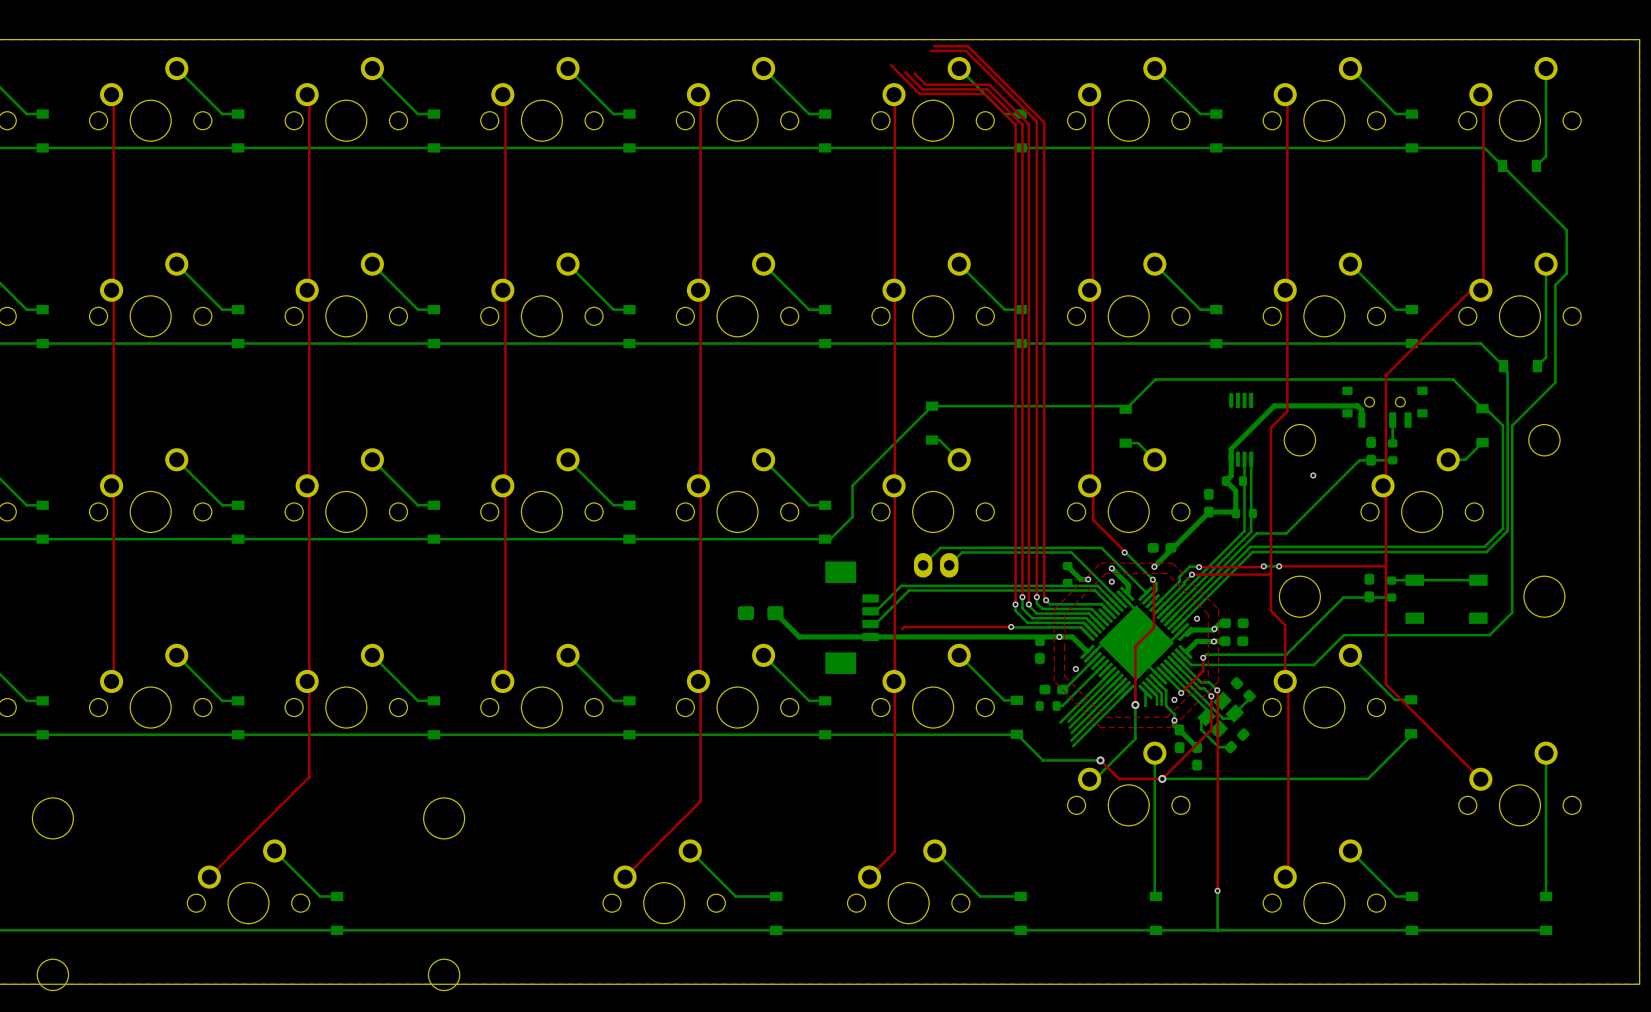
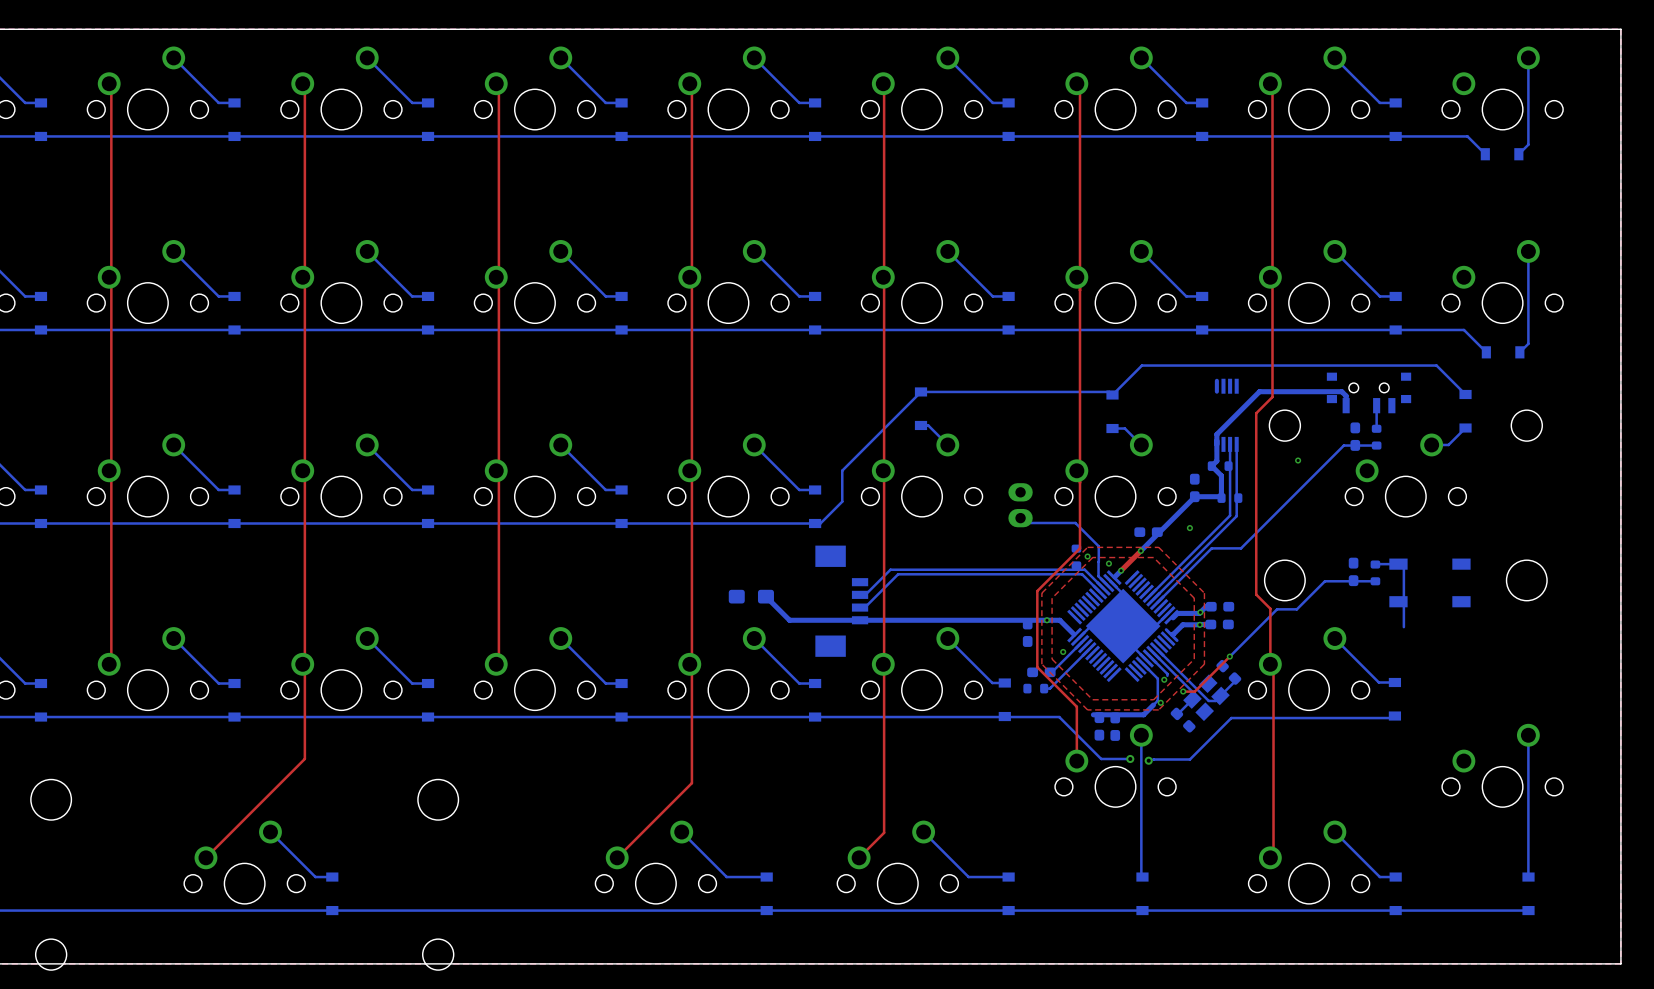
top track: (934, 46) (967, 46) (1044, 122) (1044, 598) (1046, 600) -> none
top track: (931, 50) (966, 50) (1036, 121) (1036, 597) -> none
top track: (891, 65) (919, 94) (984, 94) (1015, 124) (1015, 604) -> none
top track: (905, 72) (922, 89) (987, 89) (1022, 124) (1022, 597) -> none
top track: (914, 73) (925, 84) (989, 84) (1028, 124) (1028, 604) -> none
top track: (1483, 95) (1483, 289) -> none
bottom track: (1502, 165) (1566, 230) (1566, 273) (1555, 285) (1555, 382) (1512, 425) (1512, 612) (1489, 635) (1343, 635) (1314, 664) (1191, 664) (1181, 655) -> none
top track: (1481, 289) (1471, 290) (1385, 375) (1385, 684) (1480, 779) -> none
bottom track: (1503, 366) (1507, 372) (1507, 530) (1486, 551) (1252, 551) (1178, 626) -> none
bottom track: (1482, 408) (1486, 408) (1503, 425) (1503, 528) (1484, 546) (1250, 546) (1174, 622) -> none
top track: (1093, 492) (1093, 520) (1124, 552) -> none
top track: none -> (1079, 482) (1079, 548) (1037, 591) (1037, 667) (1076, 706) (1076, 761)
bottom track: (1286, 533) (1256, 533) (1225, 564) -> (1271, 517) (1241, 548) (1211, 548)
via: none -> (1189, 528)
bottom track: (1124, 552) (1156, 583) (1156, 590) (1149, 597) -> none
via: (1124, 552) -> none
bottom track: (923, 565) (940, 547) (1101, 547) (1145, 591) -> none
part rotation: 0° (936, 565) -> 90° clockwise (1020, 505)
part position: (936, 565) -> (1020, 505)
bottom track: (949, 565) (962, 552) (1071, 552) (1111, 592) -> (1020, 518) (1025, 523) (1075, 523) (1098, 546) (1098, 576)
bottom track: (1067, 566) (1080, 579) (1088, 579) -> none
bottom track: (1263, 566) (1279, 566) -> none
top track: (1263, 566) (1199, 567) -> none
via: (1263, 566) -> none
top track: (1279, 566) (1385, 566) -> none
via: (1279, 566) -> none
bottom track: (1199, 567) (1189, 566) (1179, 576) (1179, 581) (1156, 604) -> none
via: (1199, 567) -> none
bottom track: (1111, 568) (1128, 584) (1128, 593) -> (1121, 570) (1114, 576)
via: (1111, 568) -> none
top track: none -> (1138, 552) (1121, 570)
via: none -> (1087, 556)
top track: (1270, 573) (1192, 574) -> none
part position: (1067, 574) -> (1076, 557)
bottom track: (1191, 574) (1160, 608) -> none
via: (1191, 574) -> none
via: (1088, 579) -> none
via: none -> (1108, 563)
top track: (1152, 579) (1153, 627) (1135, 646) (1135, 704) -> none
via: (1152, 579) -> none
bottom track: (1420, 580) (1476, 580) -> (1403, 564) (1403, 627)
via: (1111, 581) -> none
via: none -> (1121, 570)
bottom track: (1022, 597) (1022, 608) (1032, 618) (1086, 618) (1094, 626) -> none
via: (1022, 597) -> none
bottom track: (1036, 597) (1036, 603) (1042, 608) (1091, 608) (1101, 619) -> none
via: (1036, 597) -> none
bottom track: (1343, 597) (1286, 654) (1206, 654) (1203, 657) -> (1327, 581) (1324, 581) (1296, 609) (1277, 609) (1229, 656)
bottom track: (1046, 600) (1050, 604) (1101, 604) (1109, 612) -> none
via: (1046, 600) -> none
bottom track: (1015, 604) (1015, 610) (1027, 622) (1083, 622) (1091, 630) -> none
via: (1015, 604) -> none
bottom track: (1028, 604) (1036, 613) (1089, 613) (1098, 622) -> none
via: (1028, 604) -> none
via: (1197, 618) -> none
bottom track: (1011, 626) (1081, 627) (1087, 633) -> none
top track: (1011, 626) (904, 626) (902, 628) -> none
via: (1011, 626) -> none
top track: (1203, 657) (1203, 671) (1181, 693) -> none
via: (1203, 657) -> none
bottom track: (1178, 659) (1201, 682) (1209, 682) (1217, 690) -> none
bottom track: (1174, 662) (1200, 688) (1204, 688) (1211, 696) -> none
bottom track: (1109, 673) (1060, 722) -> none
top track: none -> (1229, 656) (1194, 691) (1183, 691)
via: none -> (1229, 656)
bottom track: (1112, 677) (1068, 721) -> none
bottom track: (1116, 680) (1069, 727) -> none
bottom track: (1120, 684) (1071, 732) -> none
bottom track: (1152, 684) (1161, 693) (1161, 704) -> none
bottom track: (1123, 688) (1071, 740) -> none
bottom track: (1149, 688) (1156, 696) (1156, 704) -> none
bottom track: (1166, 690) (1166, 706) (1174, 714) (1174, 724) (1197, 747) -> (1152, 673) (1157, 678) (1157, 700) (1143, 714) (1093, 714)
top track: (1217, 690) (1217, 890) -> none
via: (1217, 690) -> none
bottom track: (1127, 691) (1073, 746) -> none
bottom track: (1145, 691) (1145, 706) -> none
via: (1181, 693) -> none
top track: (1211, 696) (1211, 729) (1162, 778) (1118, 778) (1100, 760) -> none
via: (1211, 696) -> none
via: none -> (1164, 679)
via: (1174, 699) -> none
bottom track: (1135, 704) (1135, 738) (1095, 779) (1089, 779) -> none
via: (1135, 704) -> none
via: none -> (1183, 691)
bottom track: (1201, 722) (1201, 729) (1218, 747) (1230, 747) -> (1187, 704) (1179, 712)
bottom track: (1017, 734) (1043, 760) (1100, 760) -> (1005, 717) (1059, 717) (1101, 758) (1130, 758)
bottom track: (1411, 735) (1367, 778) (1162, 778) -> (1394, 718) (1231, 718) (1189, 759) (1153, 759)
part: (1179, 738) -> none
part rotation: 0° (1237, 740) -> 90° clockwise (1183, 720)
part position: (1237, 740) -> (1183, 720)
part: none -> (1099, 726)
part: none -> (1115, 726)
part: (1197, 756) -> none
via: (1100, 760) -> none
via: none -> (1130, 758)
bottom track: (1217, 890) (1217, 930) -> none
via: (1217, 890) -> none

